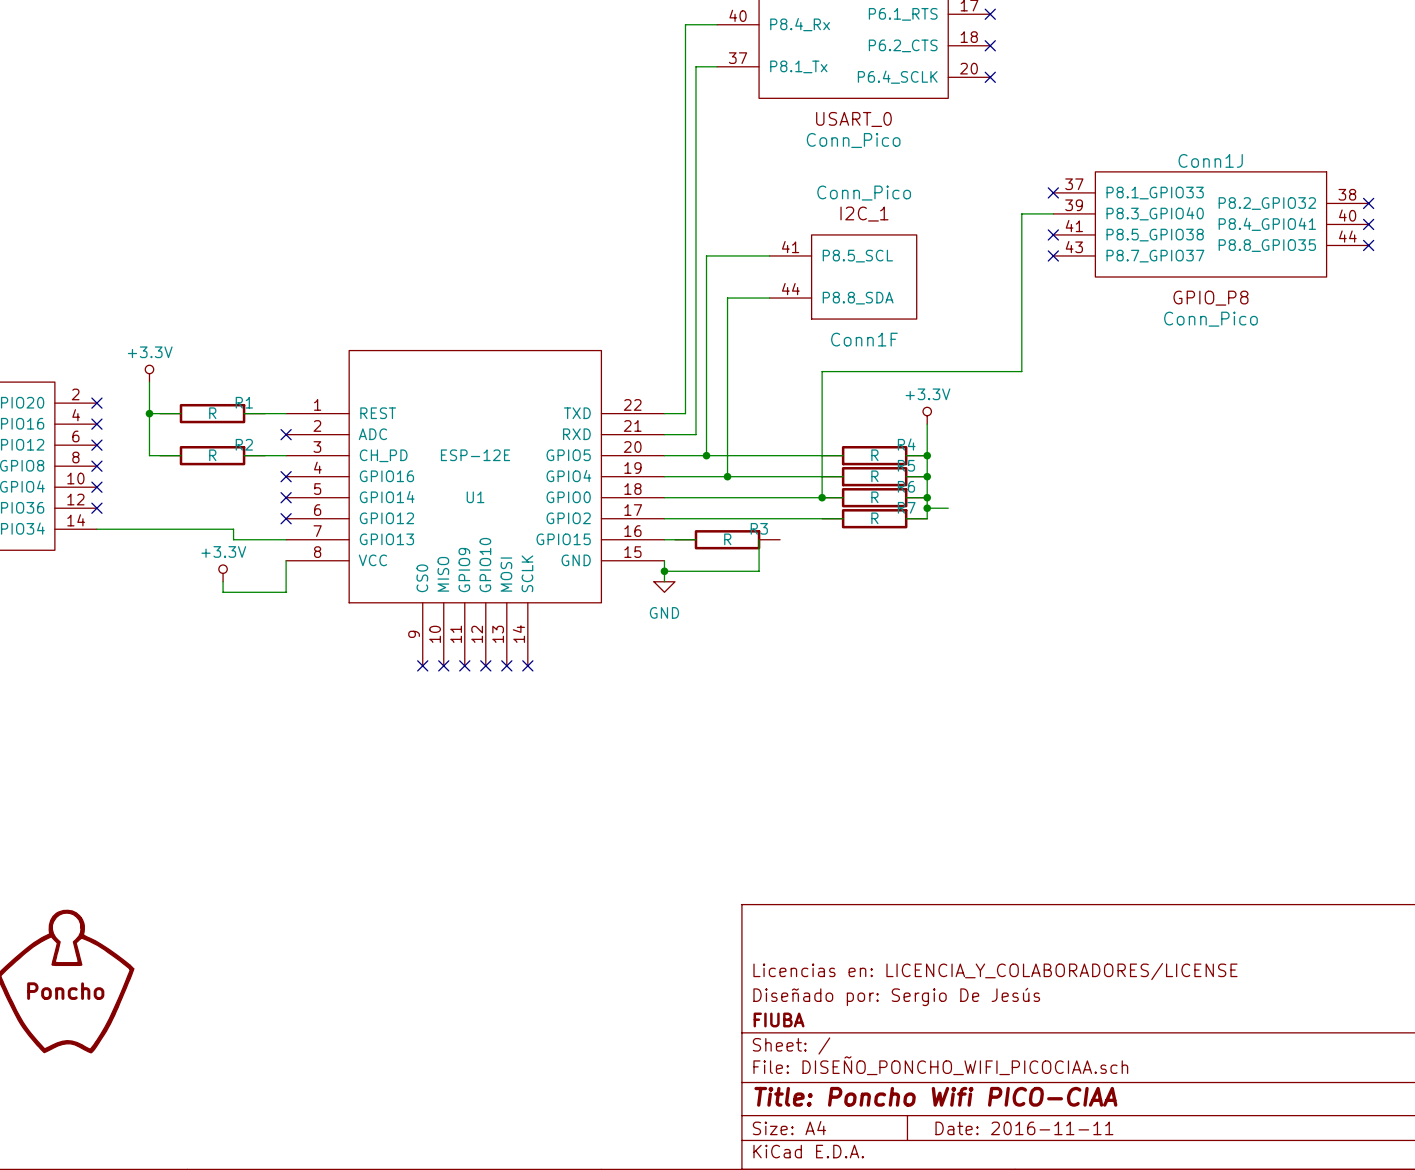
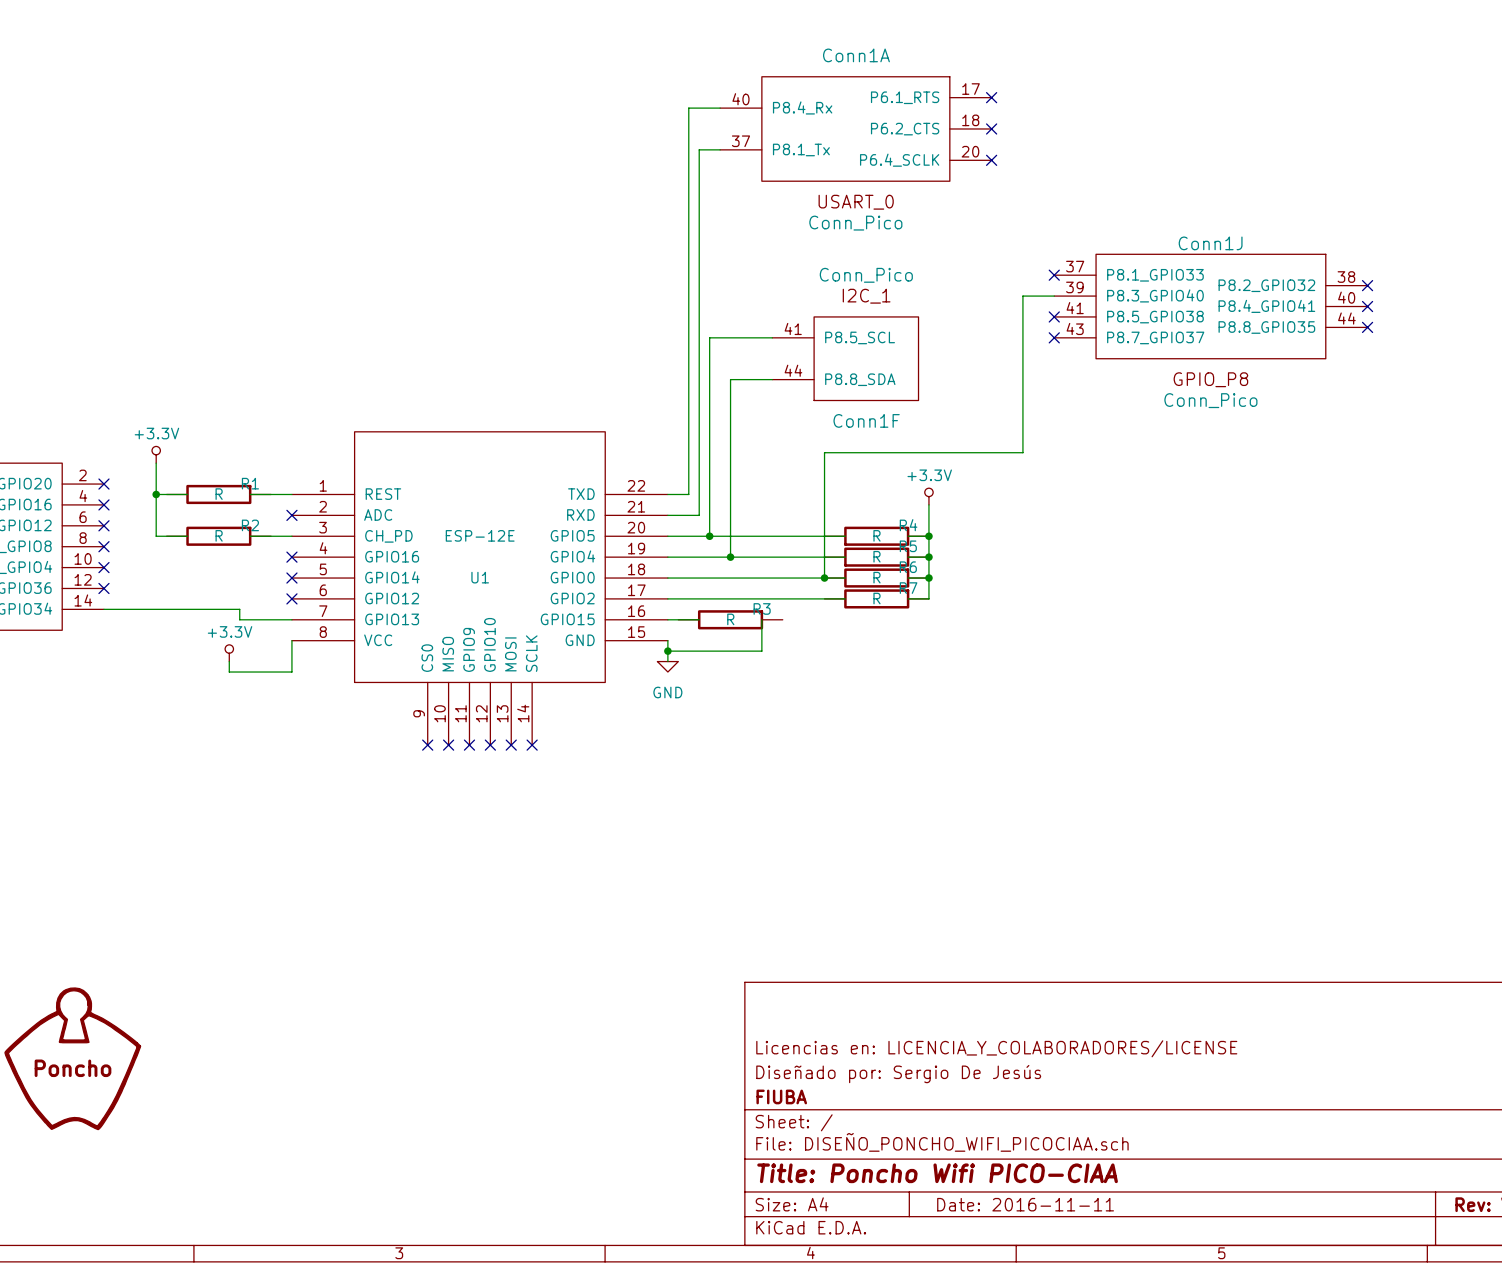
wire: (927, 508) (948, 508) -> none
junction: (927, 508) -> none

